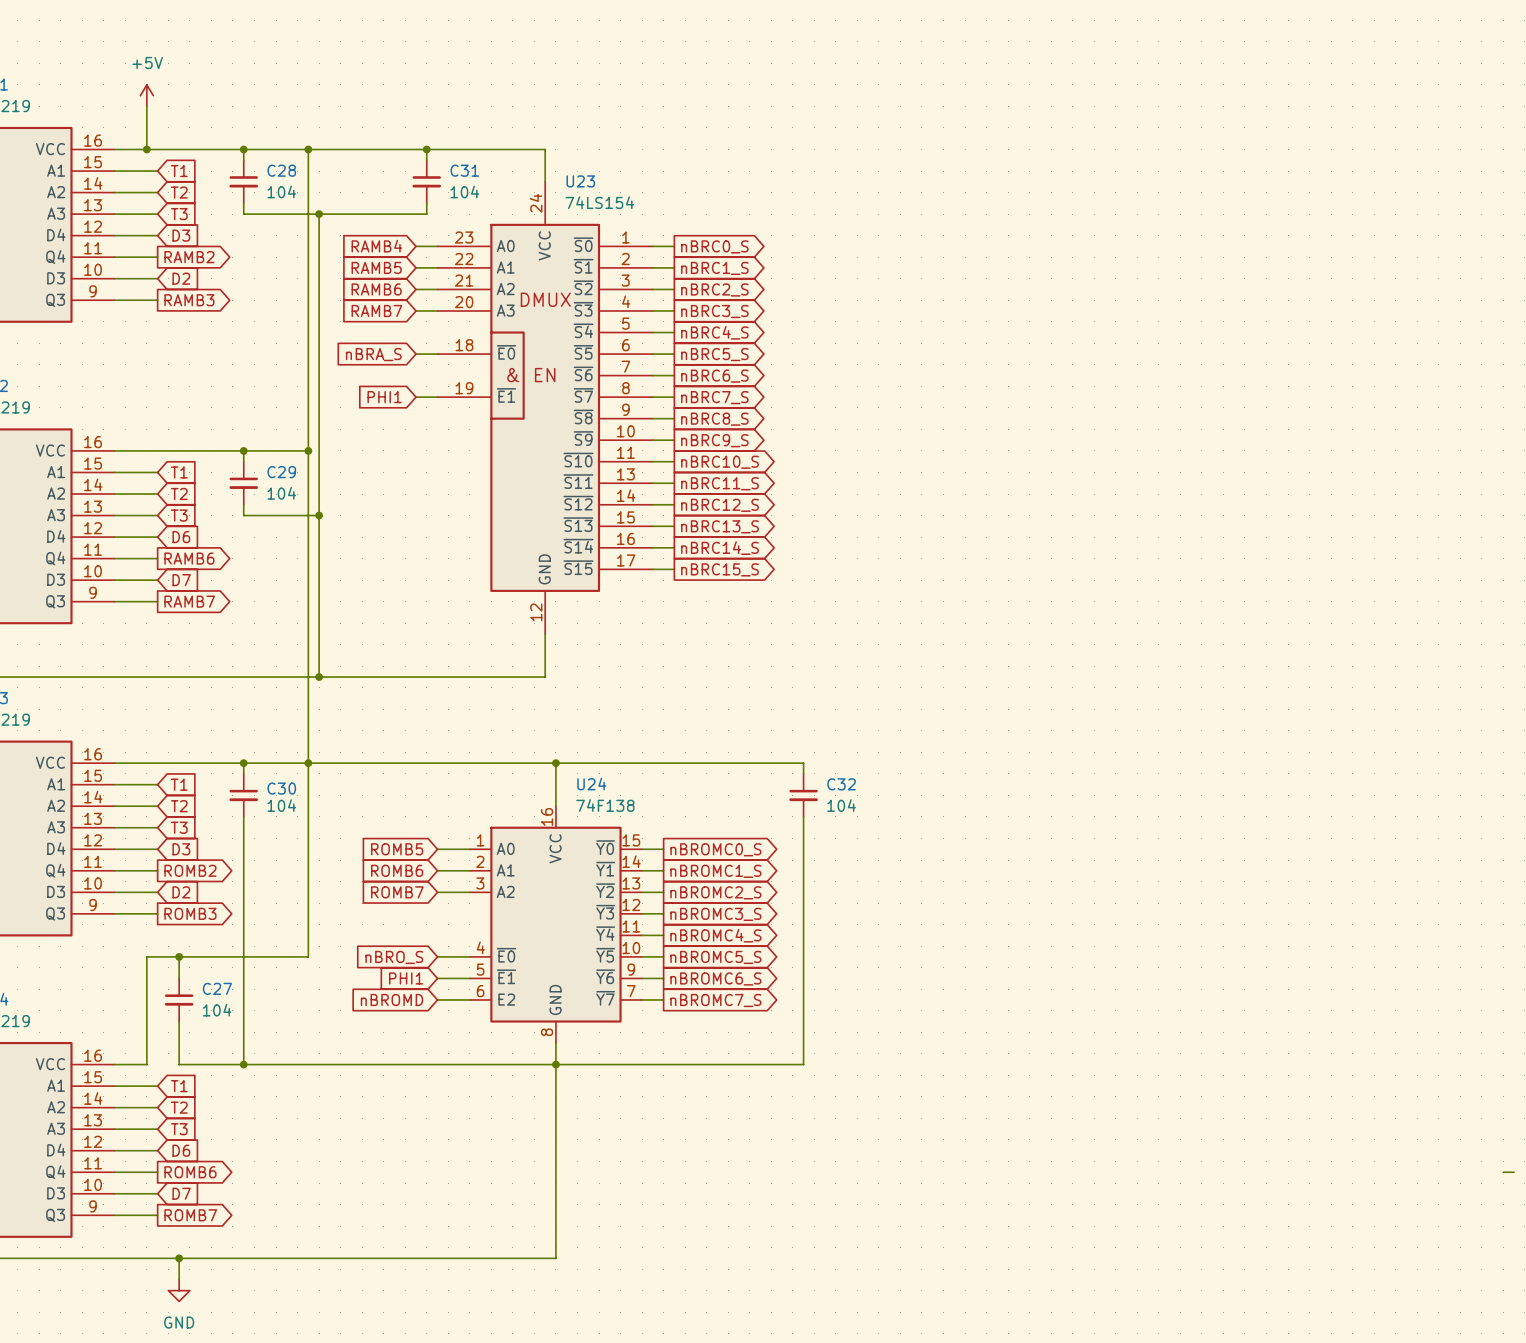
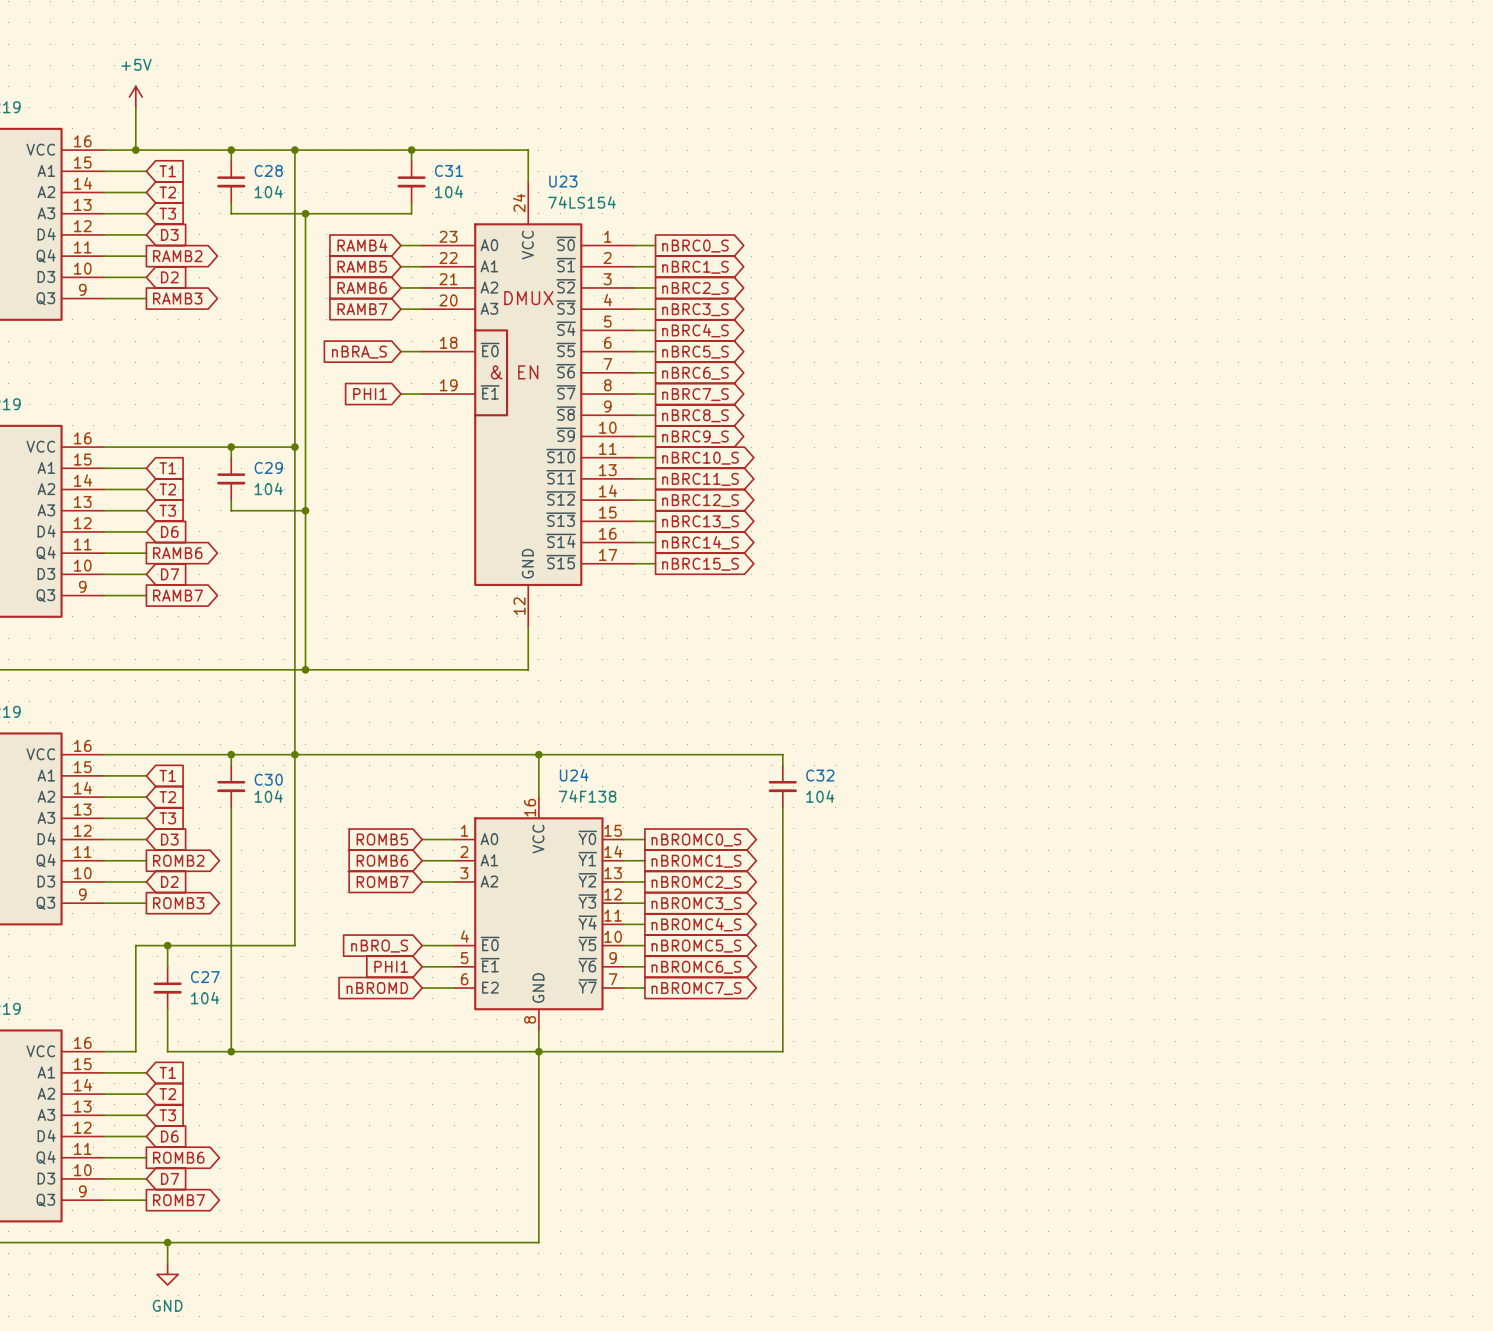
wire: (1503, 1172) (1514, 1172) -> none

